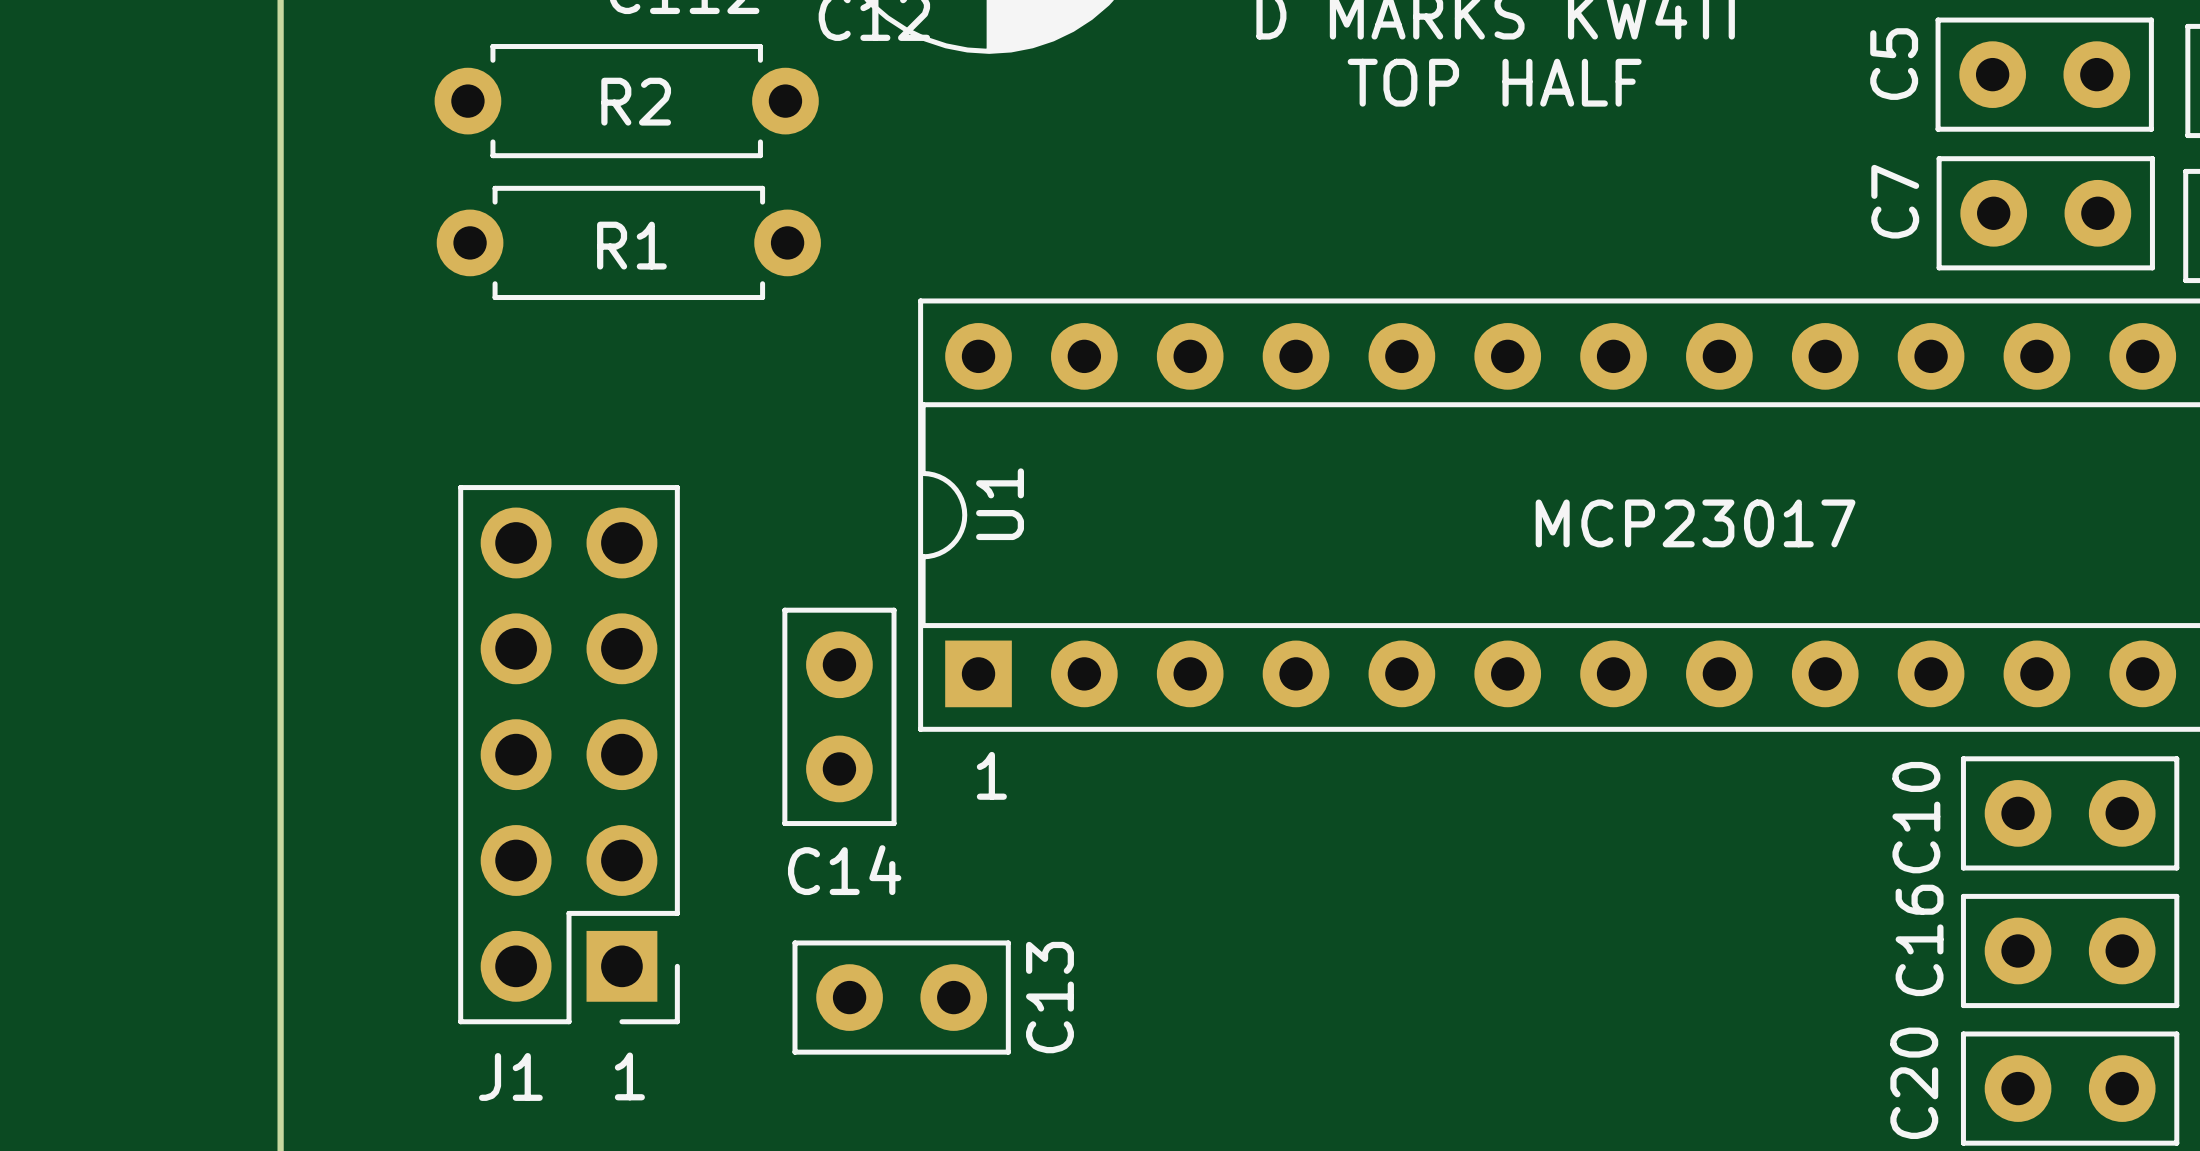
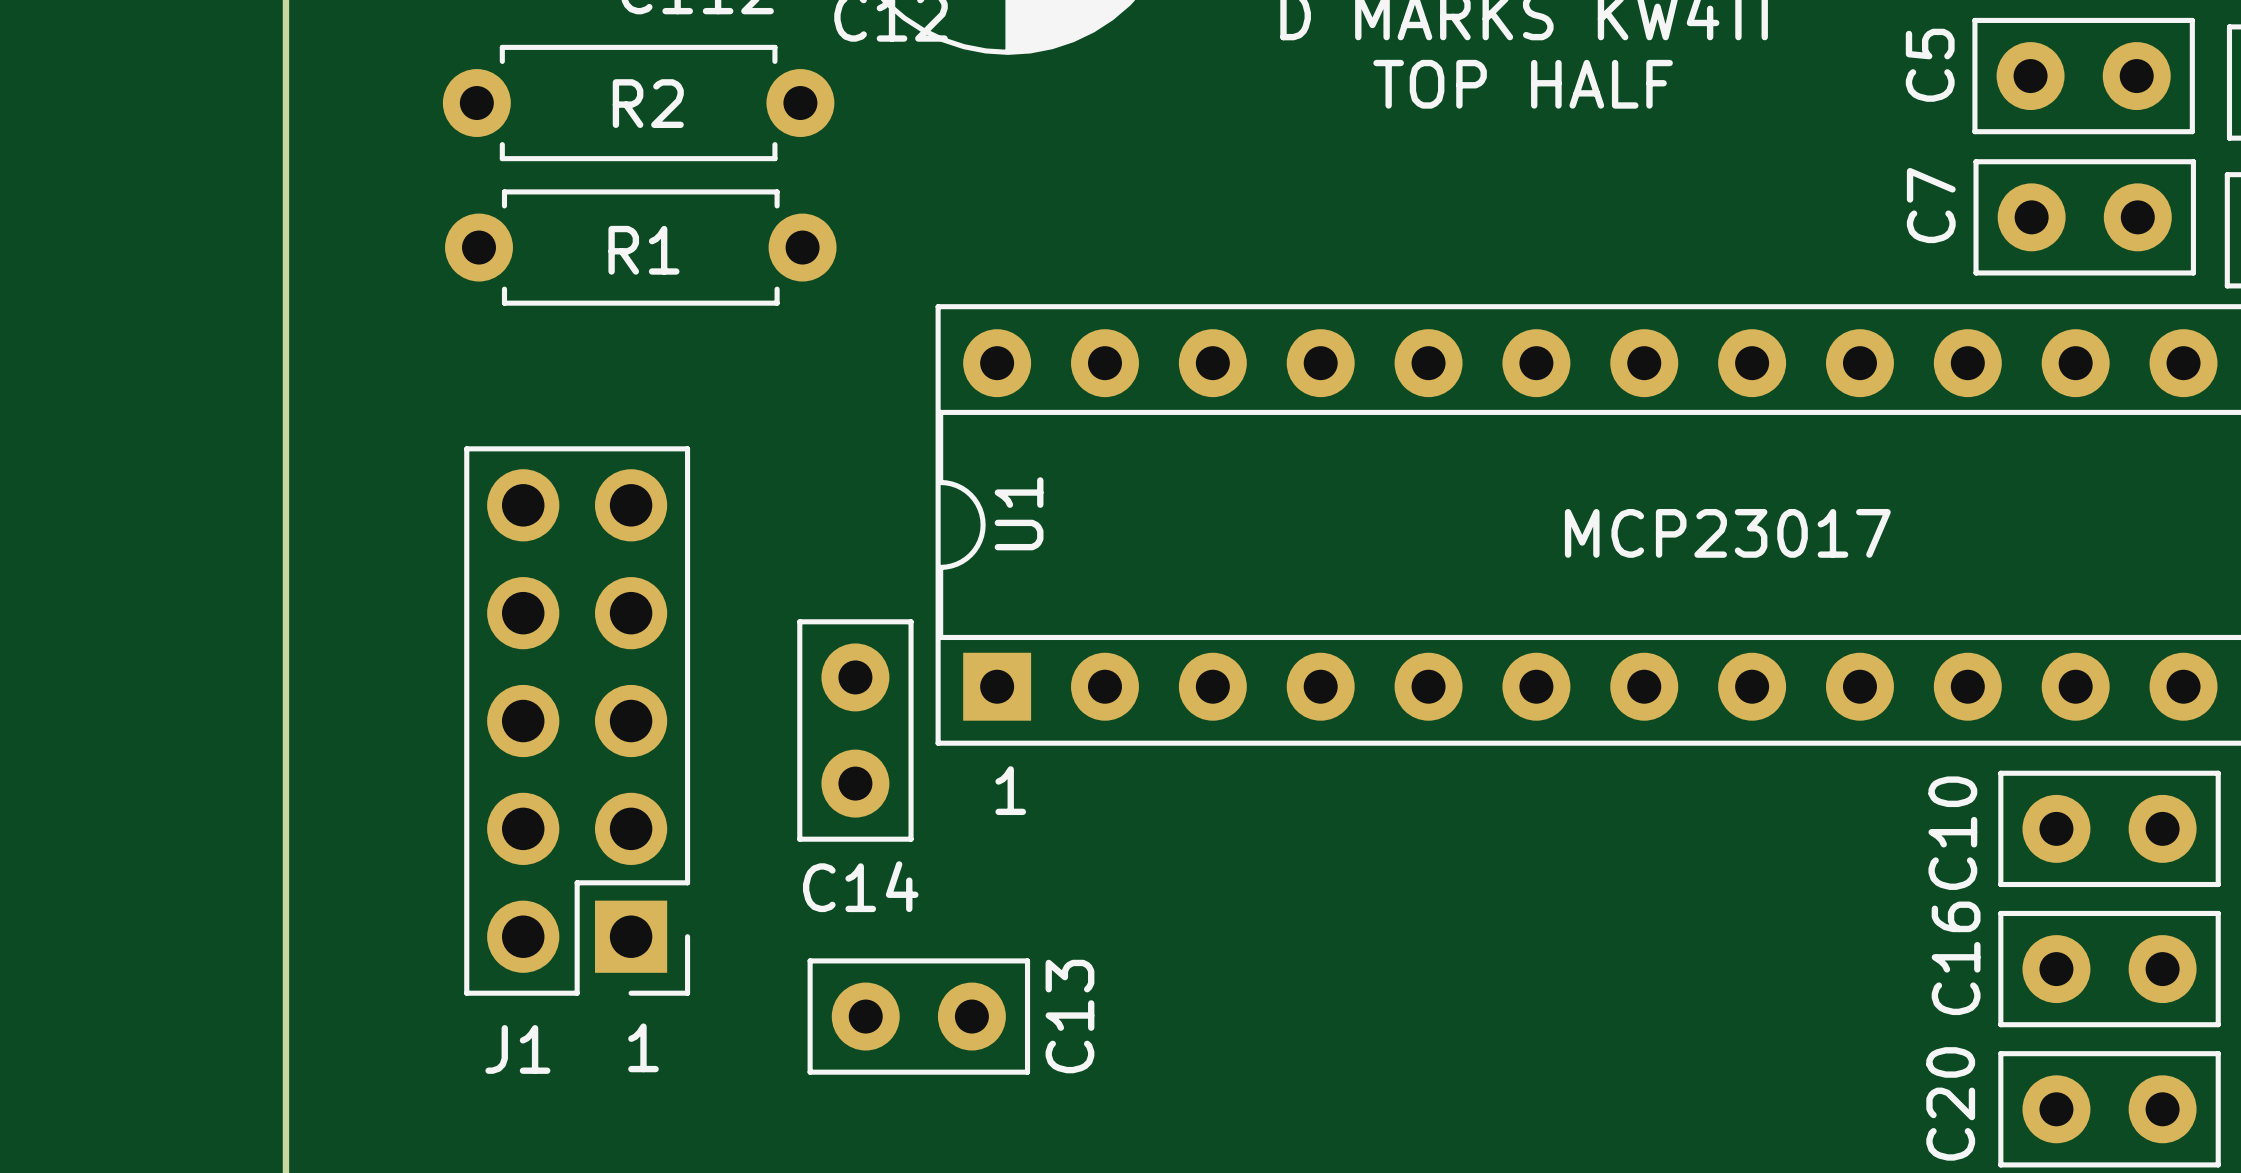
J1 position: (569, 754) -> (577, 721)
text position: 1 (629, 1076) -> 1 (643, 1047)

